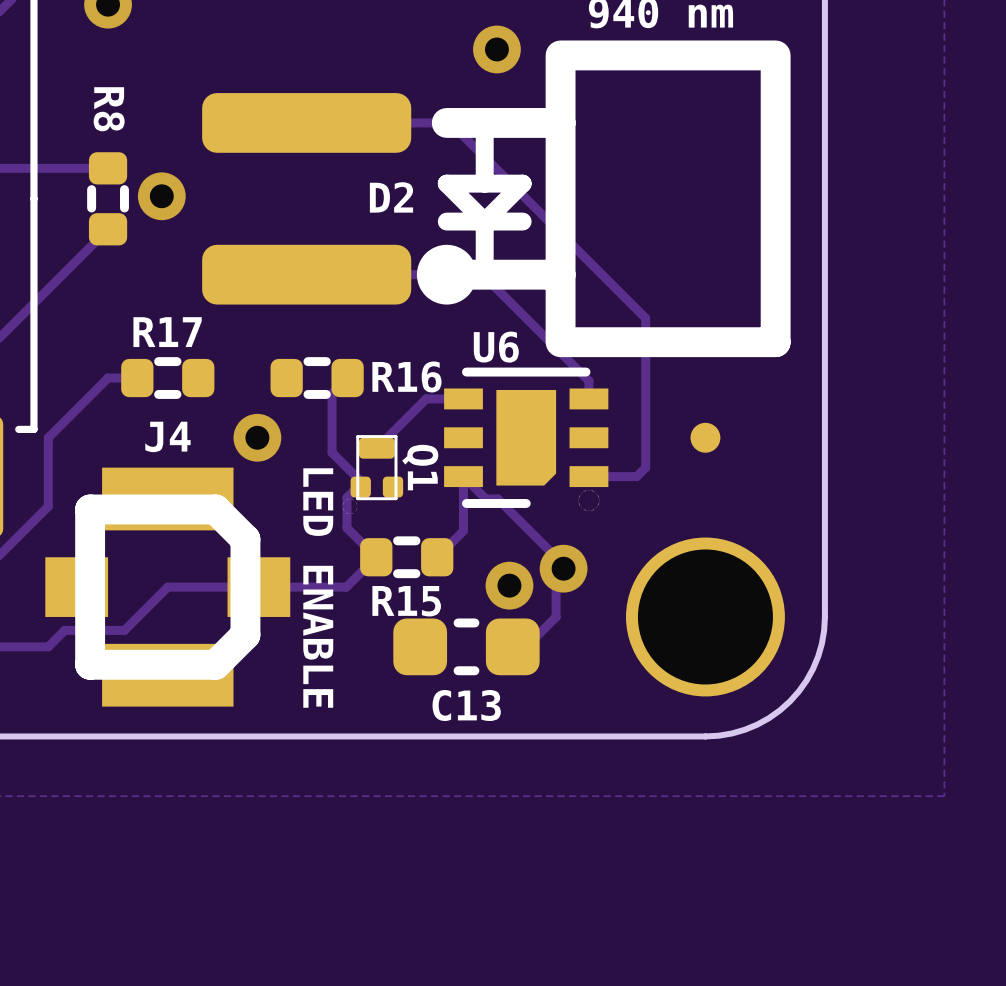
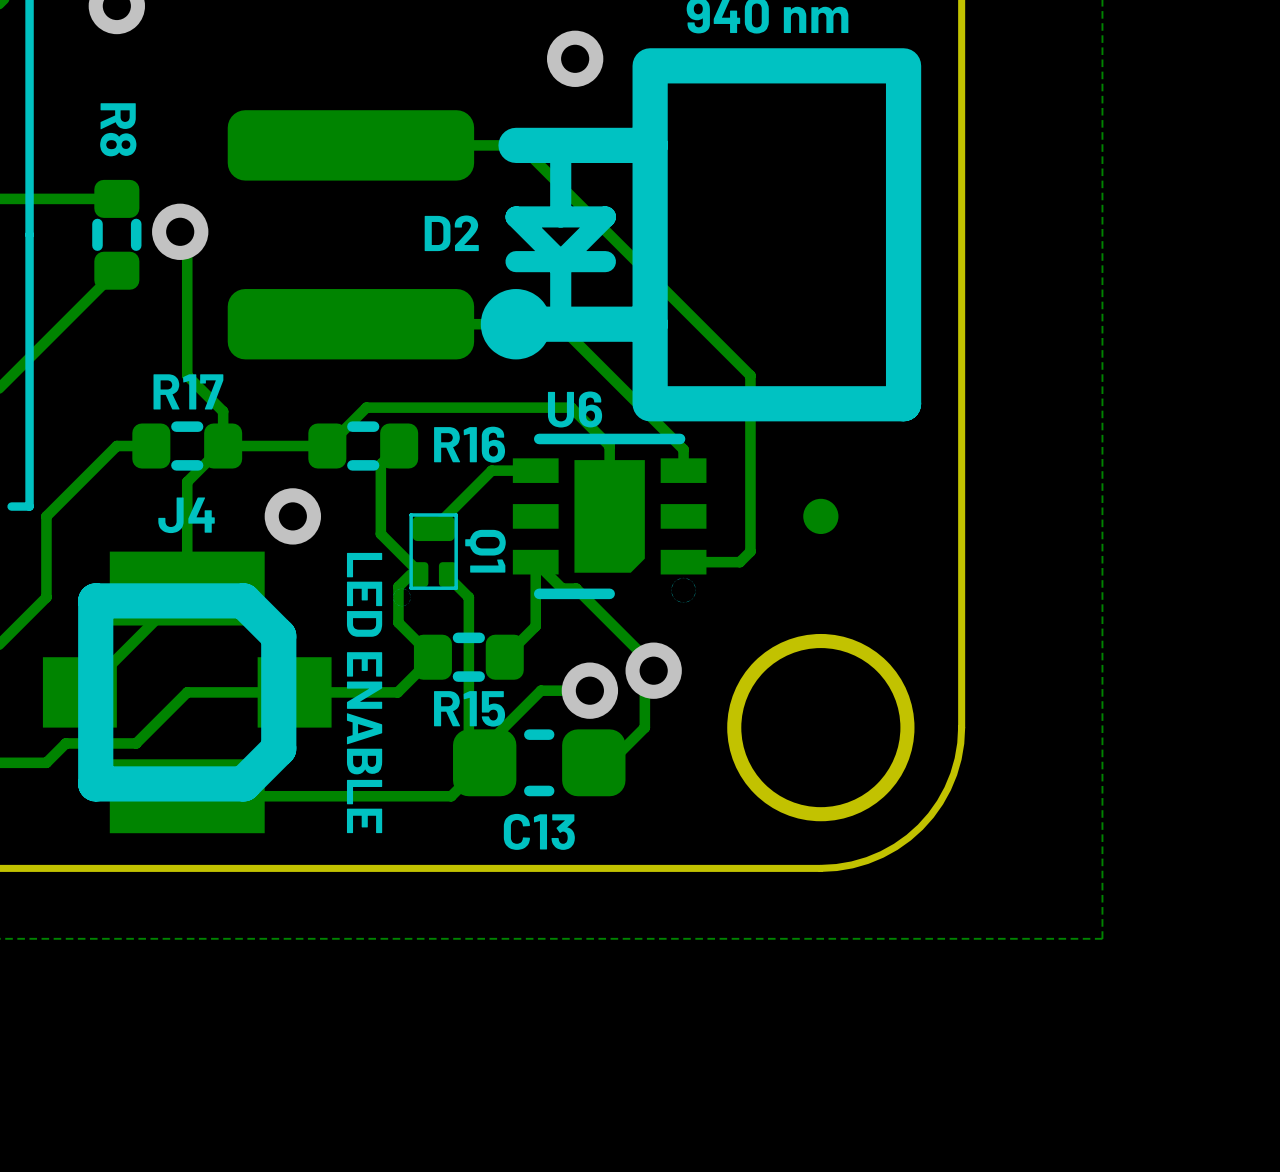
track: none -> (187, 238) (187, 375) (223, 411) (223, 446)
track: none -> (223, 446) (187, 481) (187, 588) (83, 692)
track: none -> (327, 446) (223, 446)
track: none -> (328, 446) (366, 407) (571, 407) (609, 446) (609, 516)
Q1 footprint: [342, 435, 404, 514] -> [393, 513, 458, 607]
track: none -> (445, 574) (468, 597) (468, 746)
track: none -> (589, 690) (540, 690) (484, 746)
track: none -> (484, 762) (451, 796) (187, 796)

